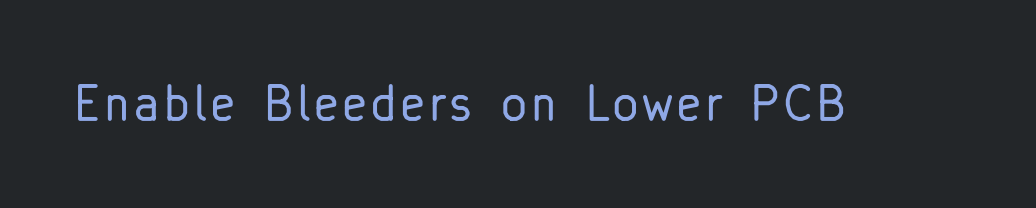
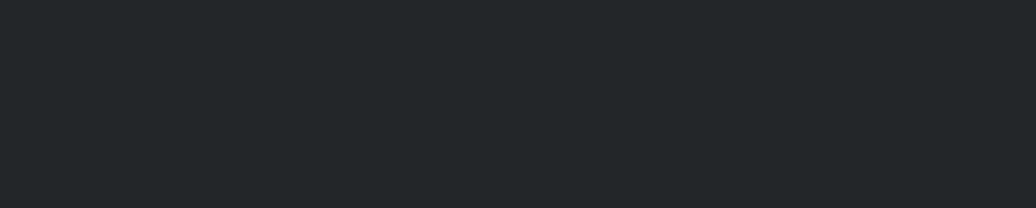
text: Enable Bleeders on Lower PCB (460, 102) -> none

